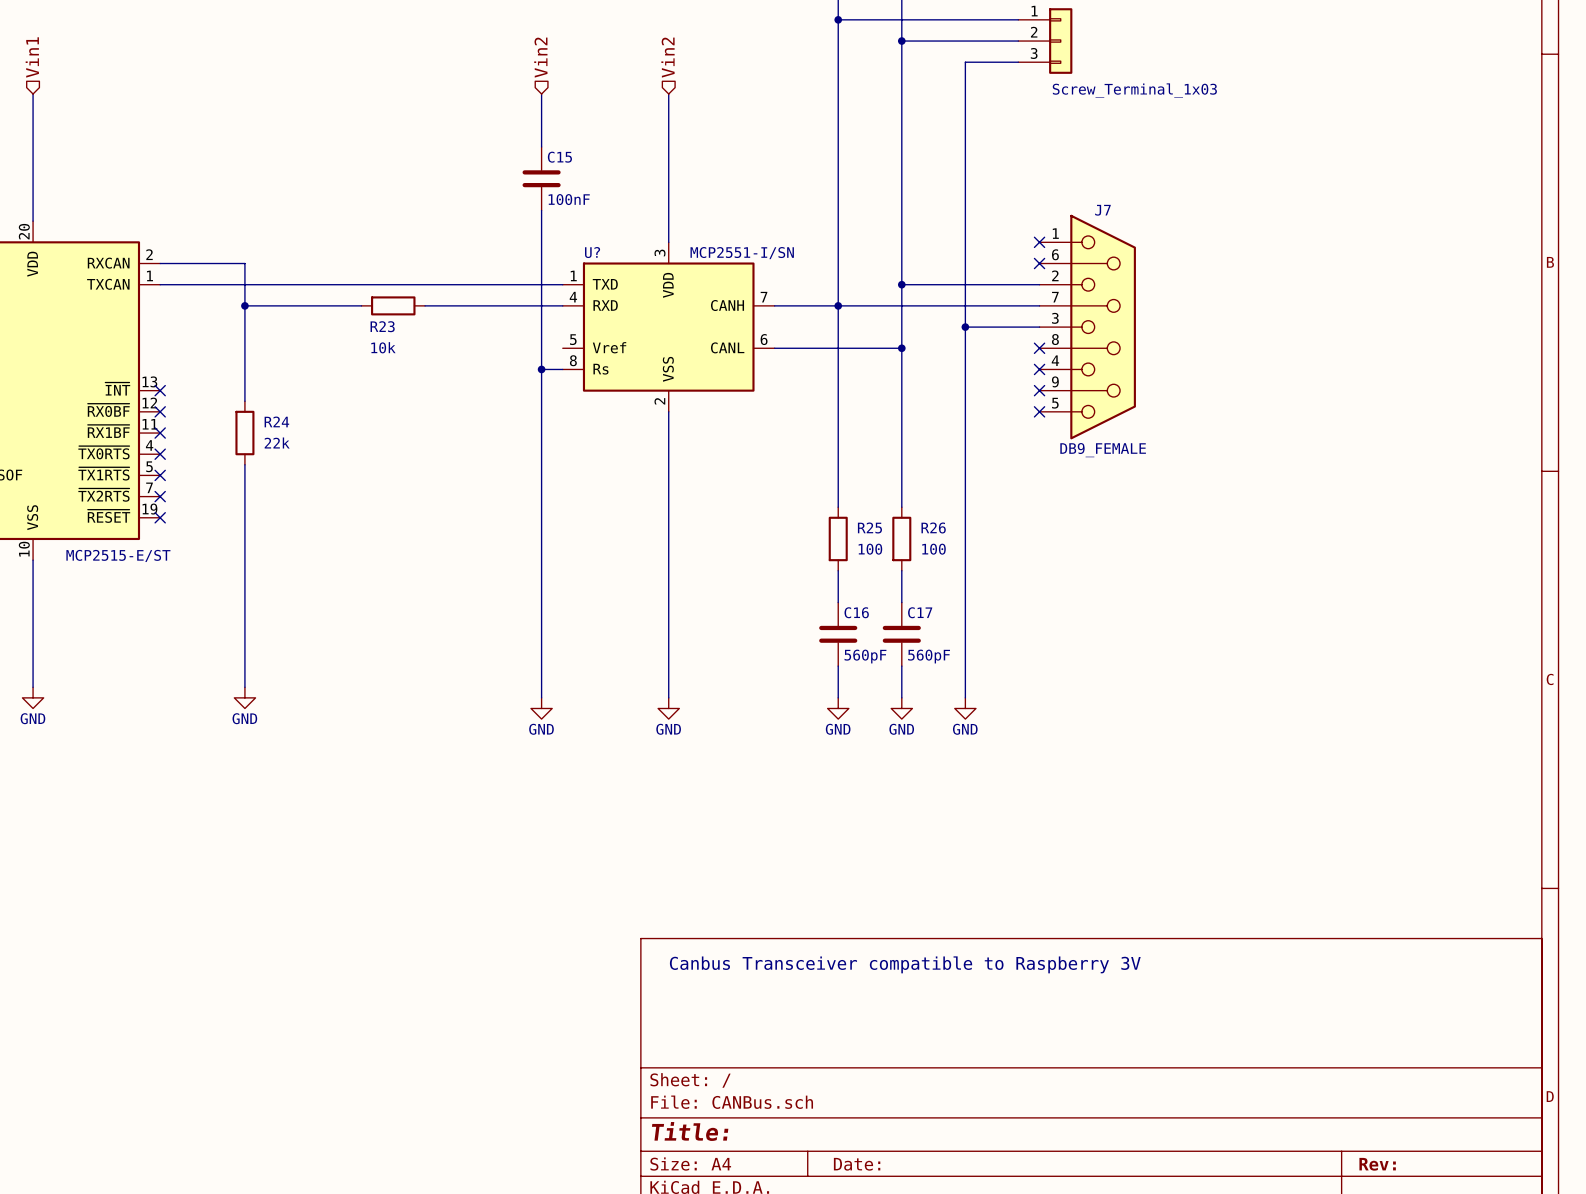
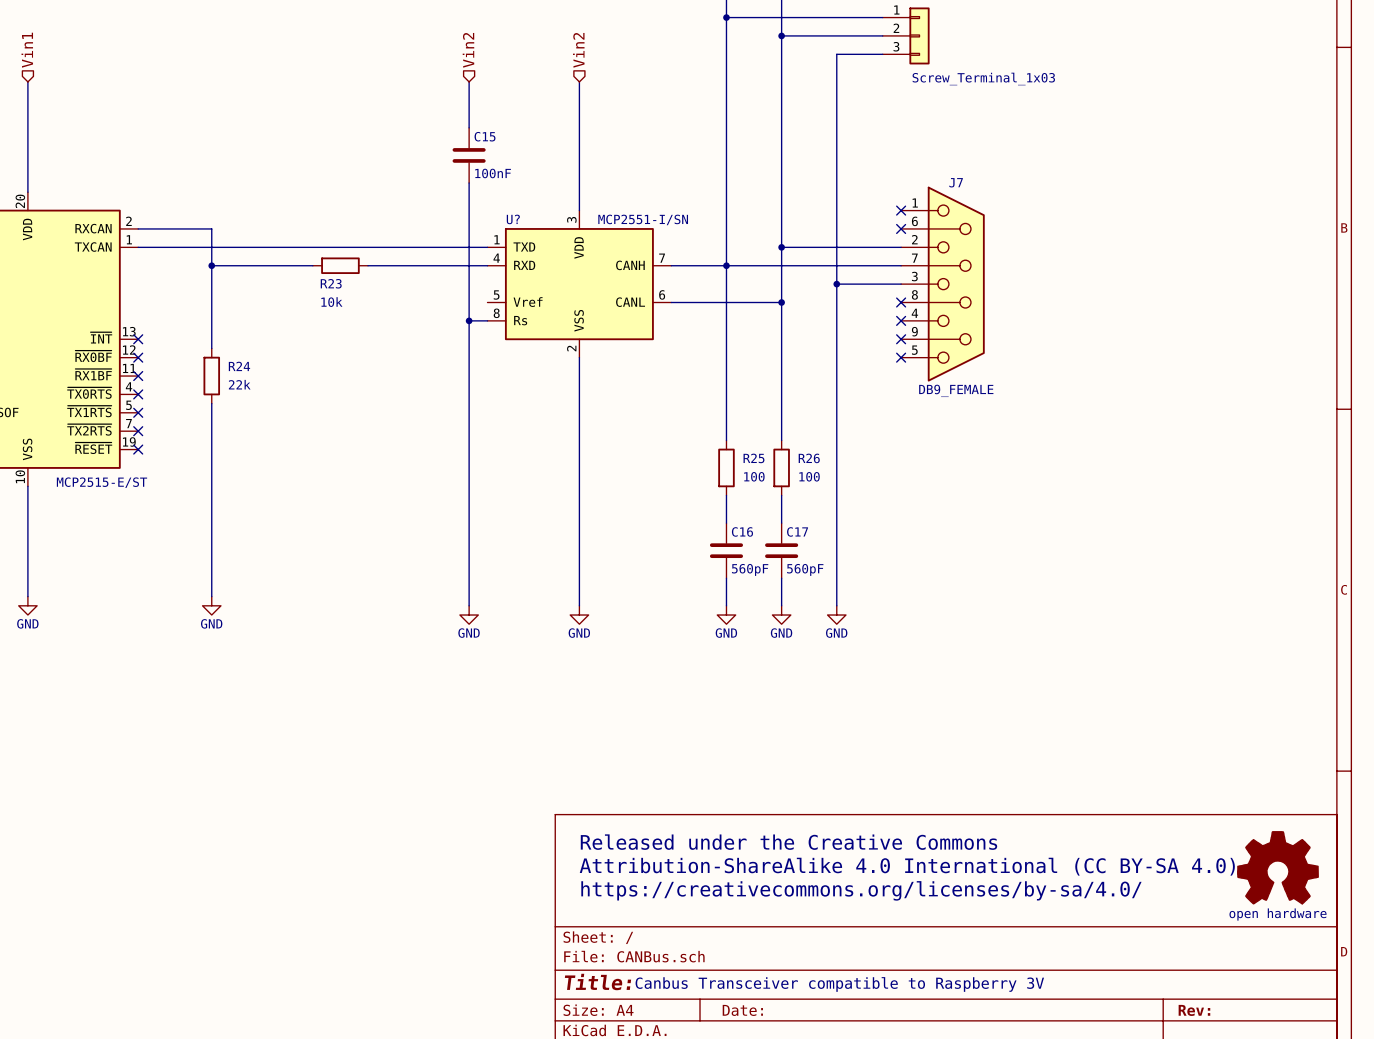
text position: Canbus Transceiver compatible to Raspberry 3V (905, 964) -> Canbus Transceiver compatible to Raspberry 3V (839, 984)
text: none -> Released under the Creative Commons (788, 842)
text: none -> Attribution-ShareAlike 4.0 International (CC BY-SA 4.0) (907, 866)
power symbol: none -> open hardware (1277, 867)
text: none -> https://creativecommons.org/licenses/by-sa/4.0/ (861, 890)

